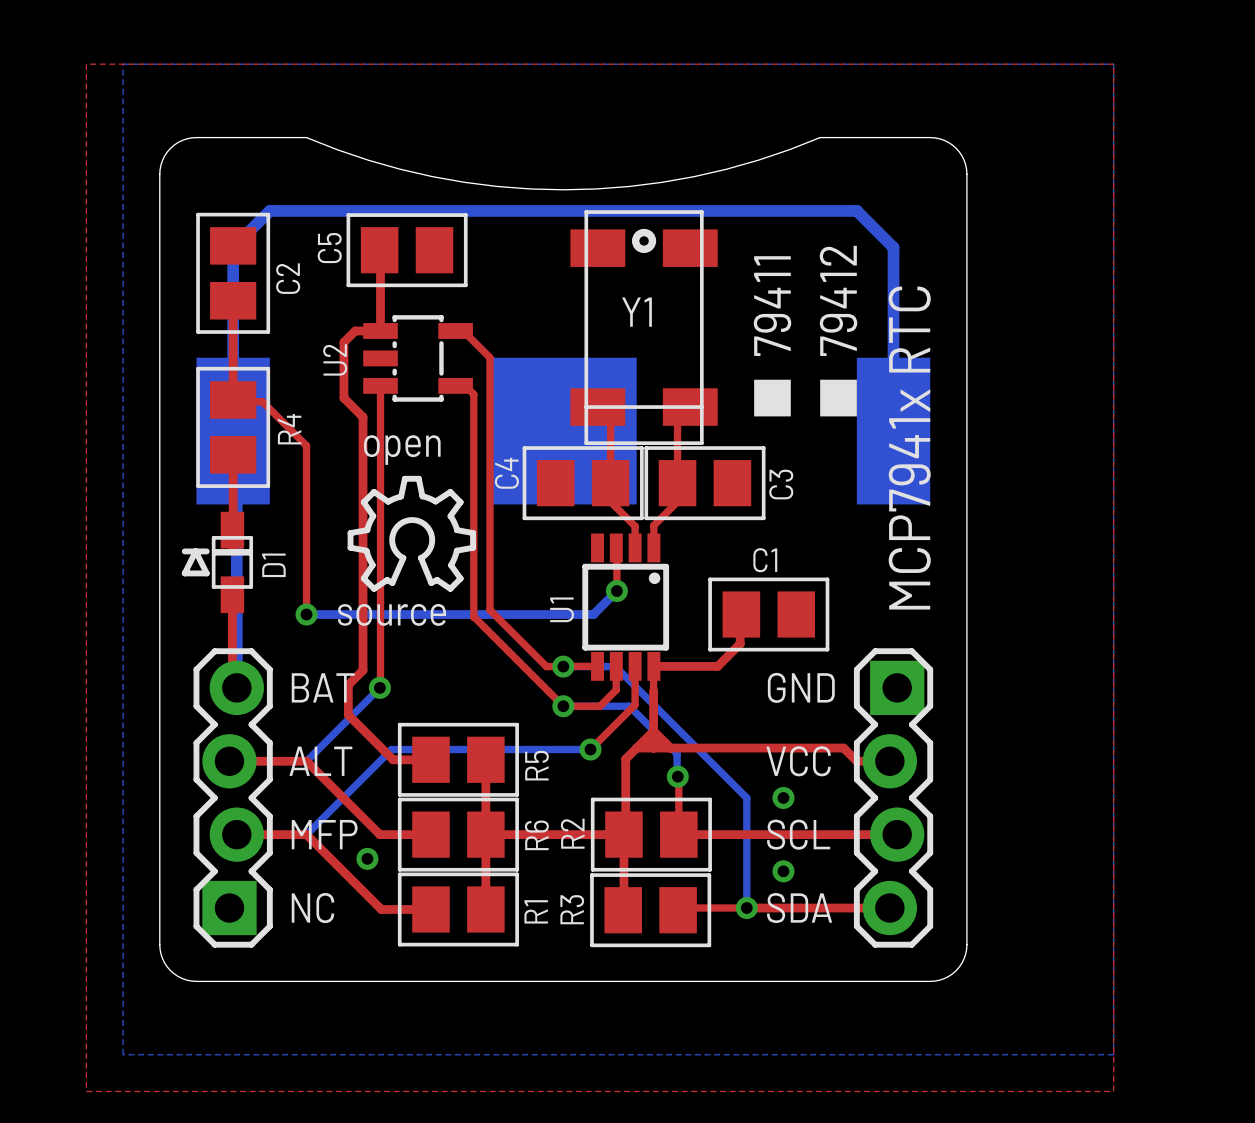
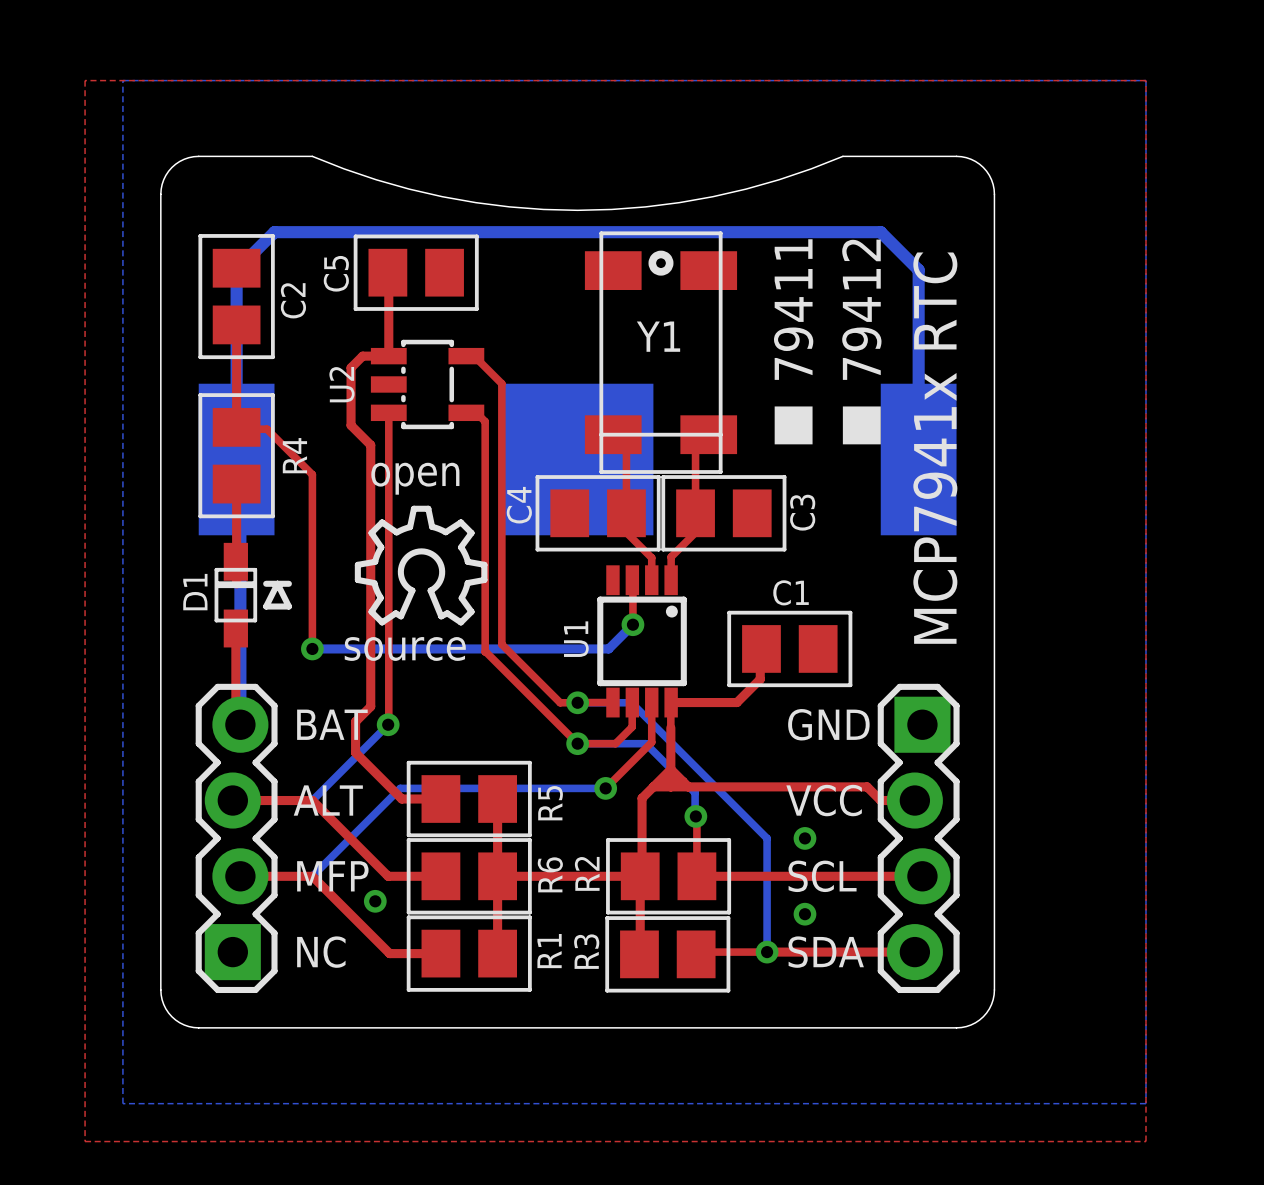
D1 footprint: [181, 511, 254, 614] -> [214, 542, 292, 648]
D1 name position: D1 (273, 565) -> D1 (195, 592)

